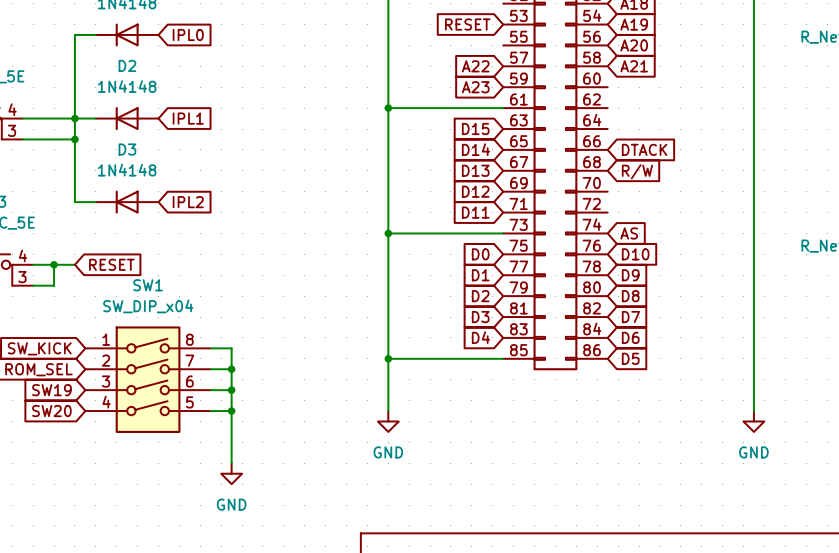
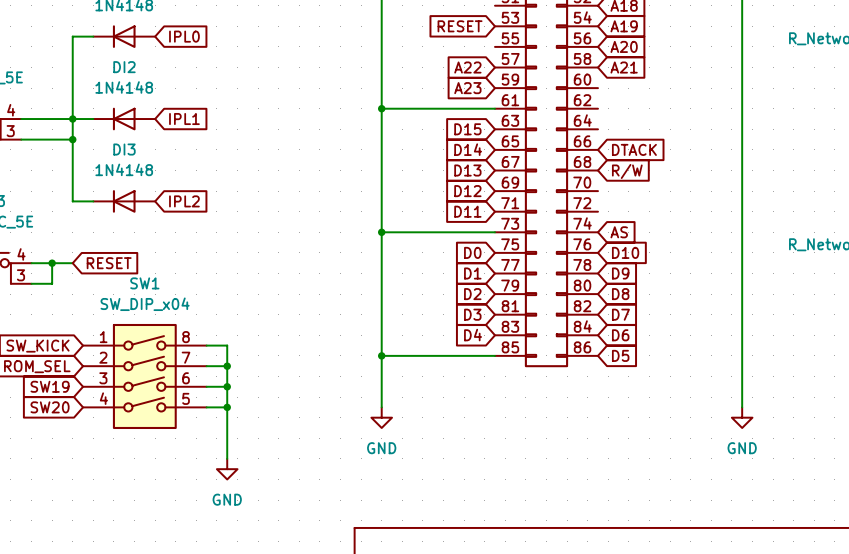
D2 name: D2 (127, 65) -> DI2 (124, 67)
D3 name: D3 (127, 149) -> DI3 (124, 149)

